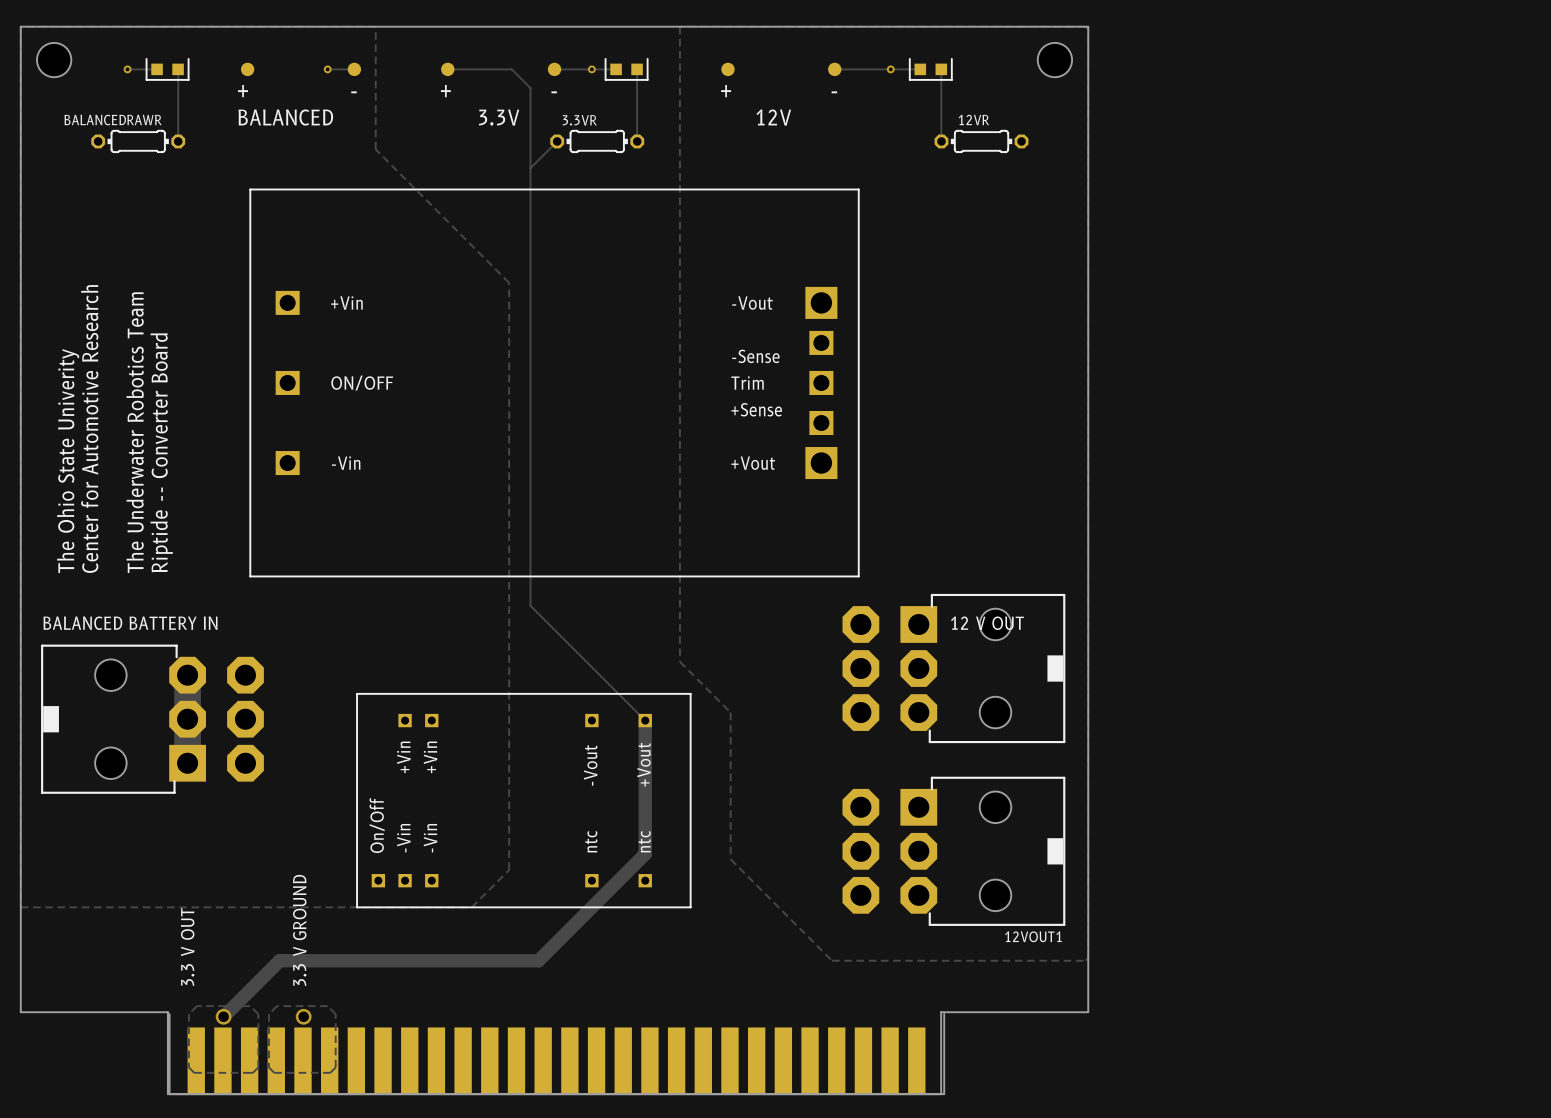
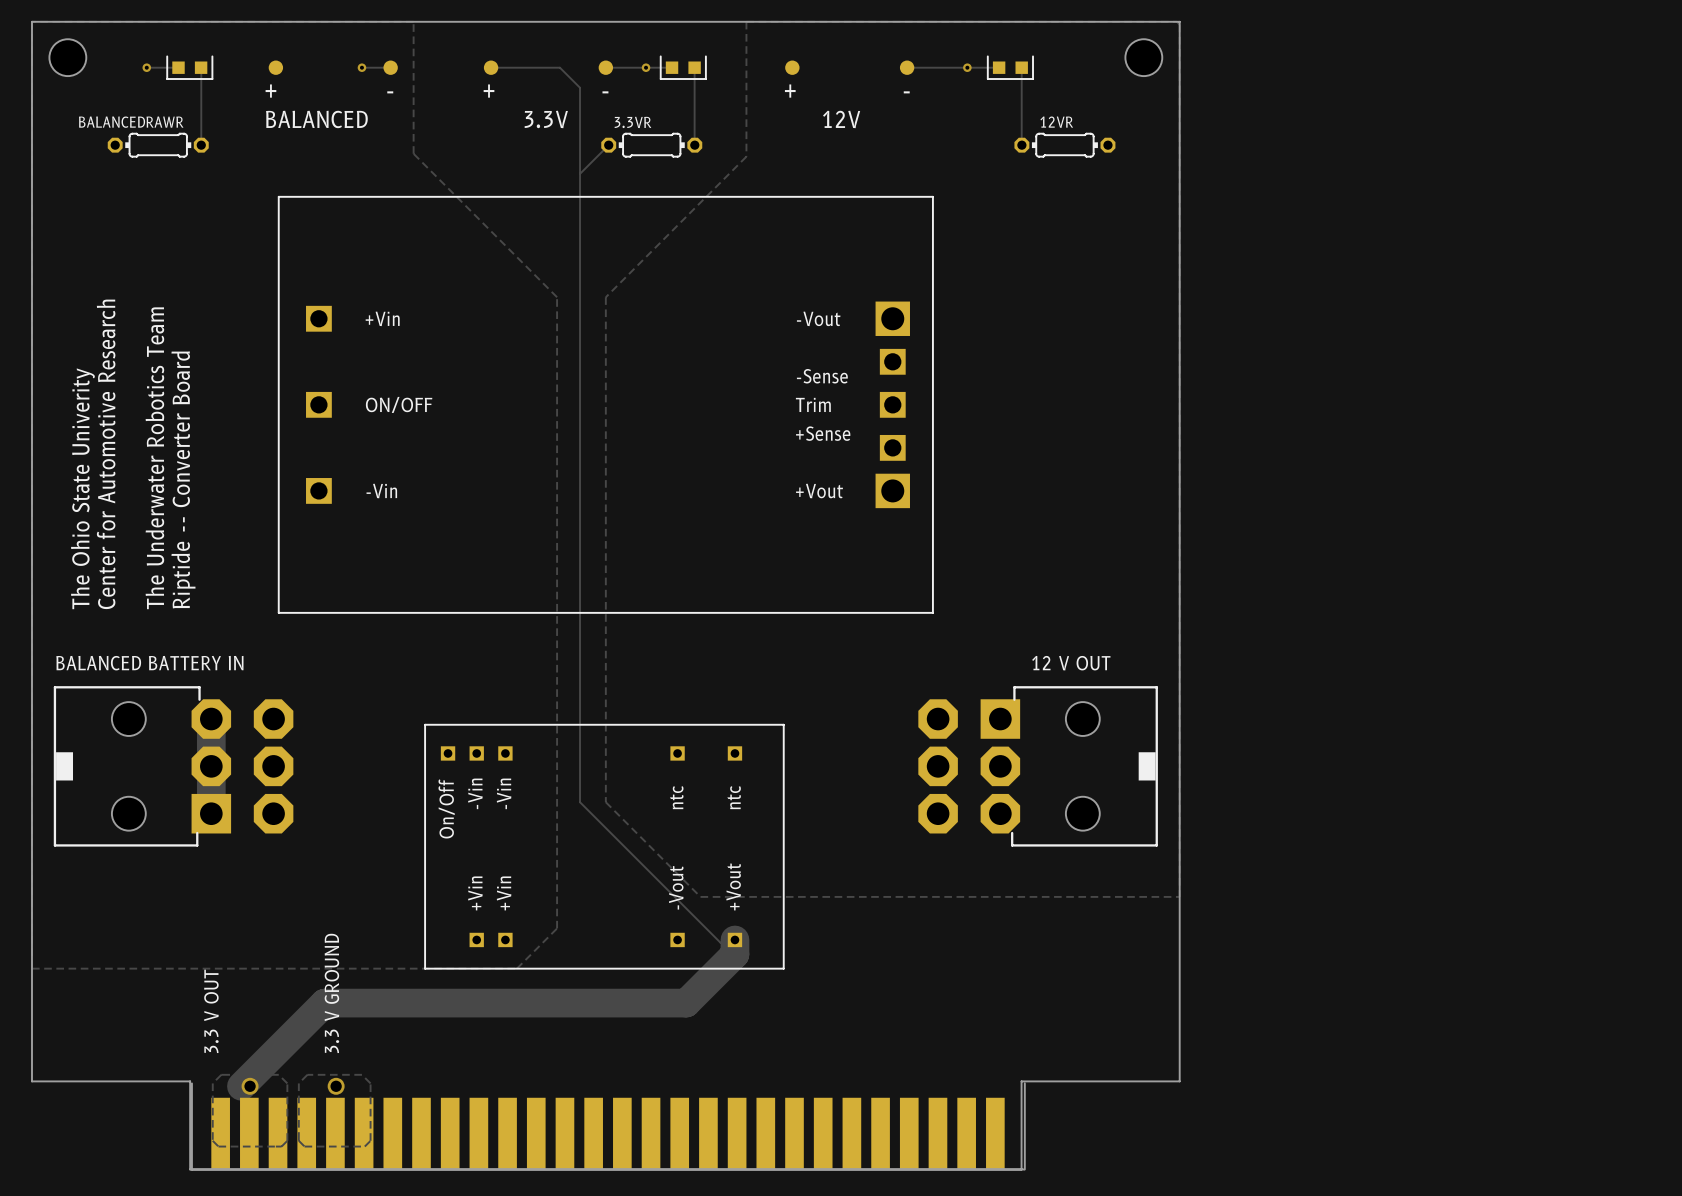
zone outline: (685, 26) (679, 26) (679, 661) (730, 712) (730, 859) (832, 960) (1085, 960) (1088, 958) (1088, 840) -> (746, 21) (746, 156) (605, 297) (605, 802) (700, 896) (1179, 896)
track: (530, 605) (645, 720) (645, 853) (538, 960) (279, 960) (223, 1016) -> (580, 644) (580, 802) (720, 942) (732, 942) (734, 939) (734, 954) (686, 1003) (324, 1003) (241, 1086)
part position: (953, 668) -> (1038, 766)
part: none -> (604, 846)
part: (523, 800) -> none
12VOUT1: (953, 851) -> none

